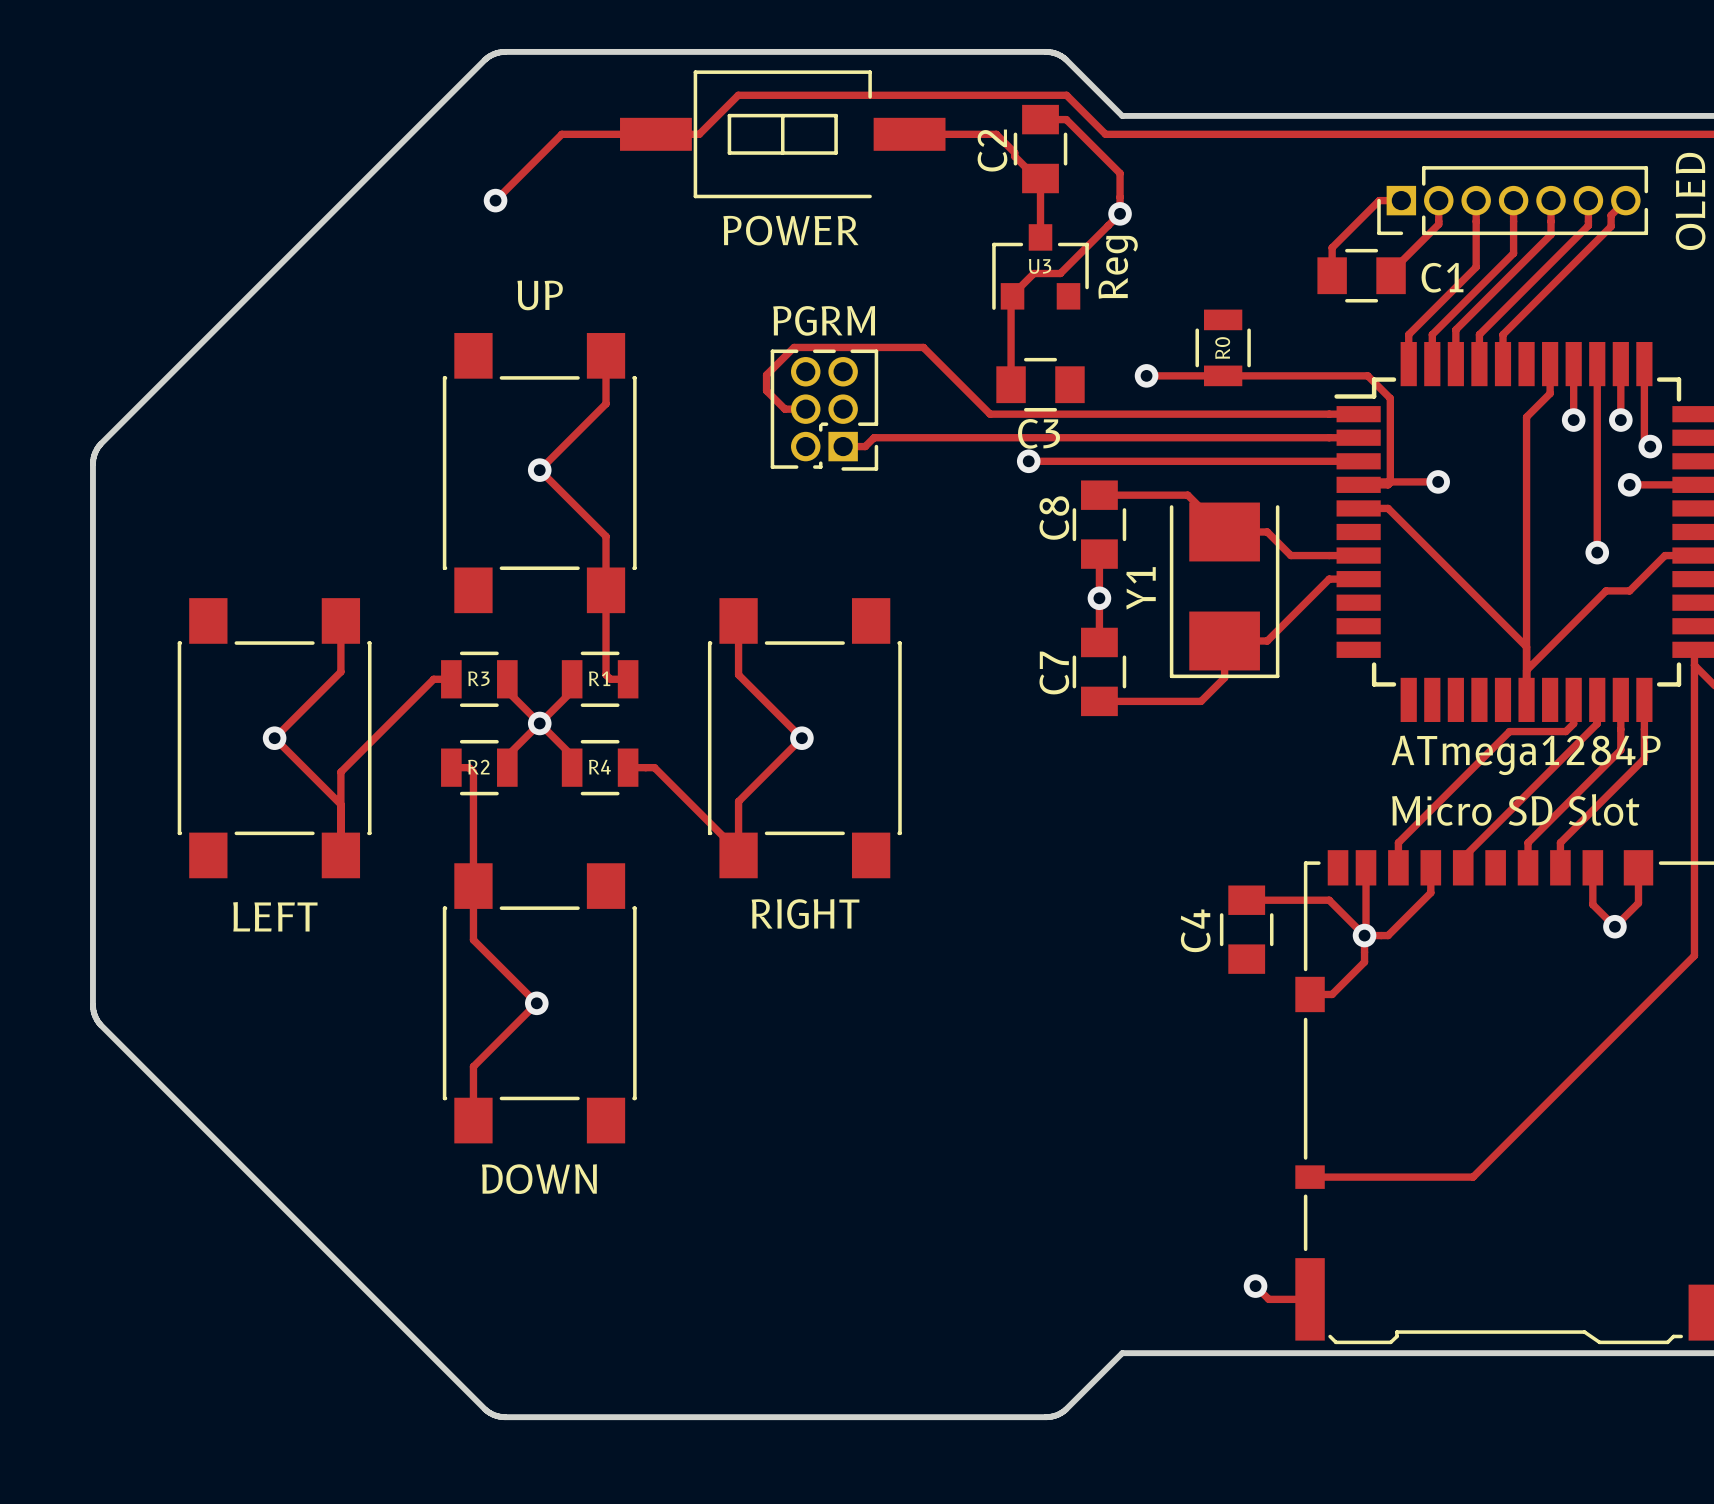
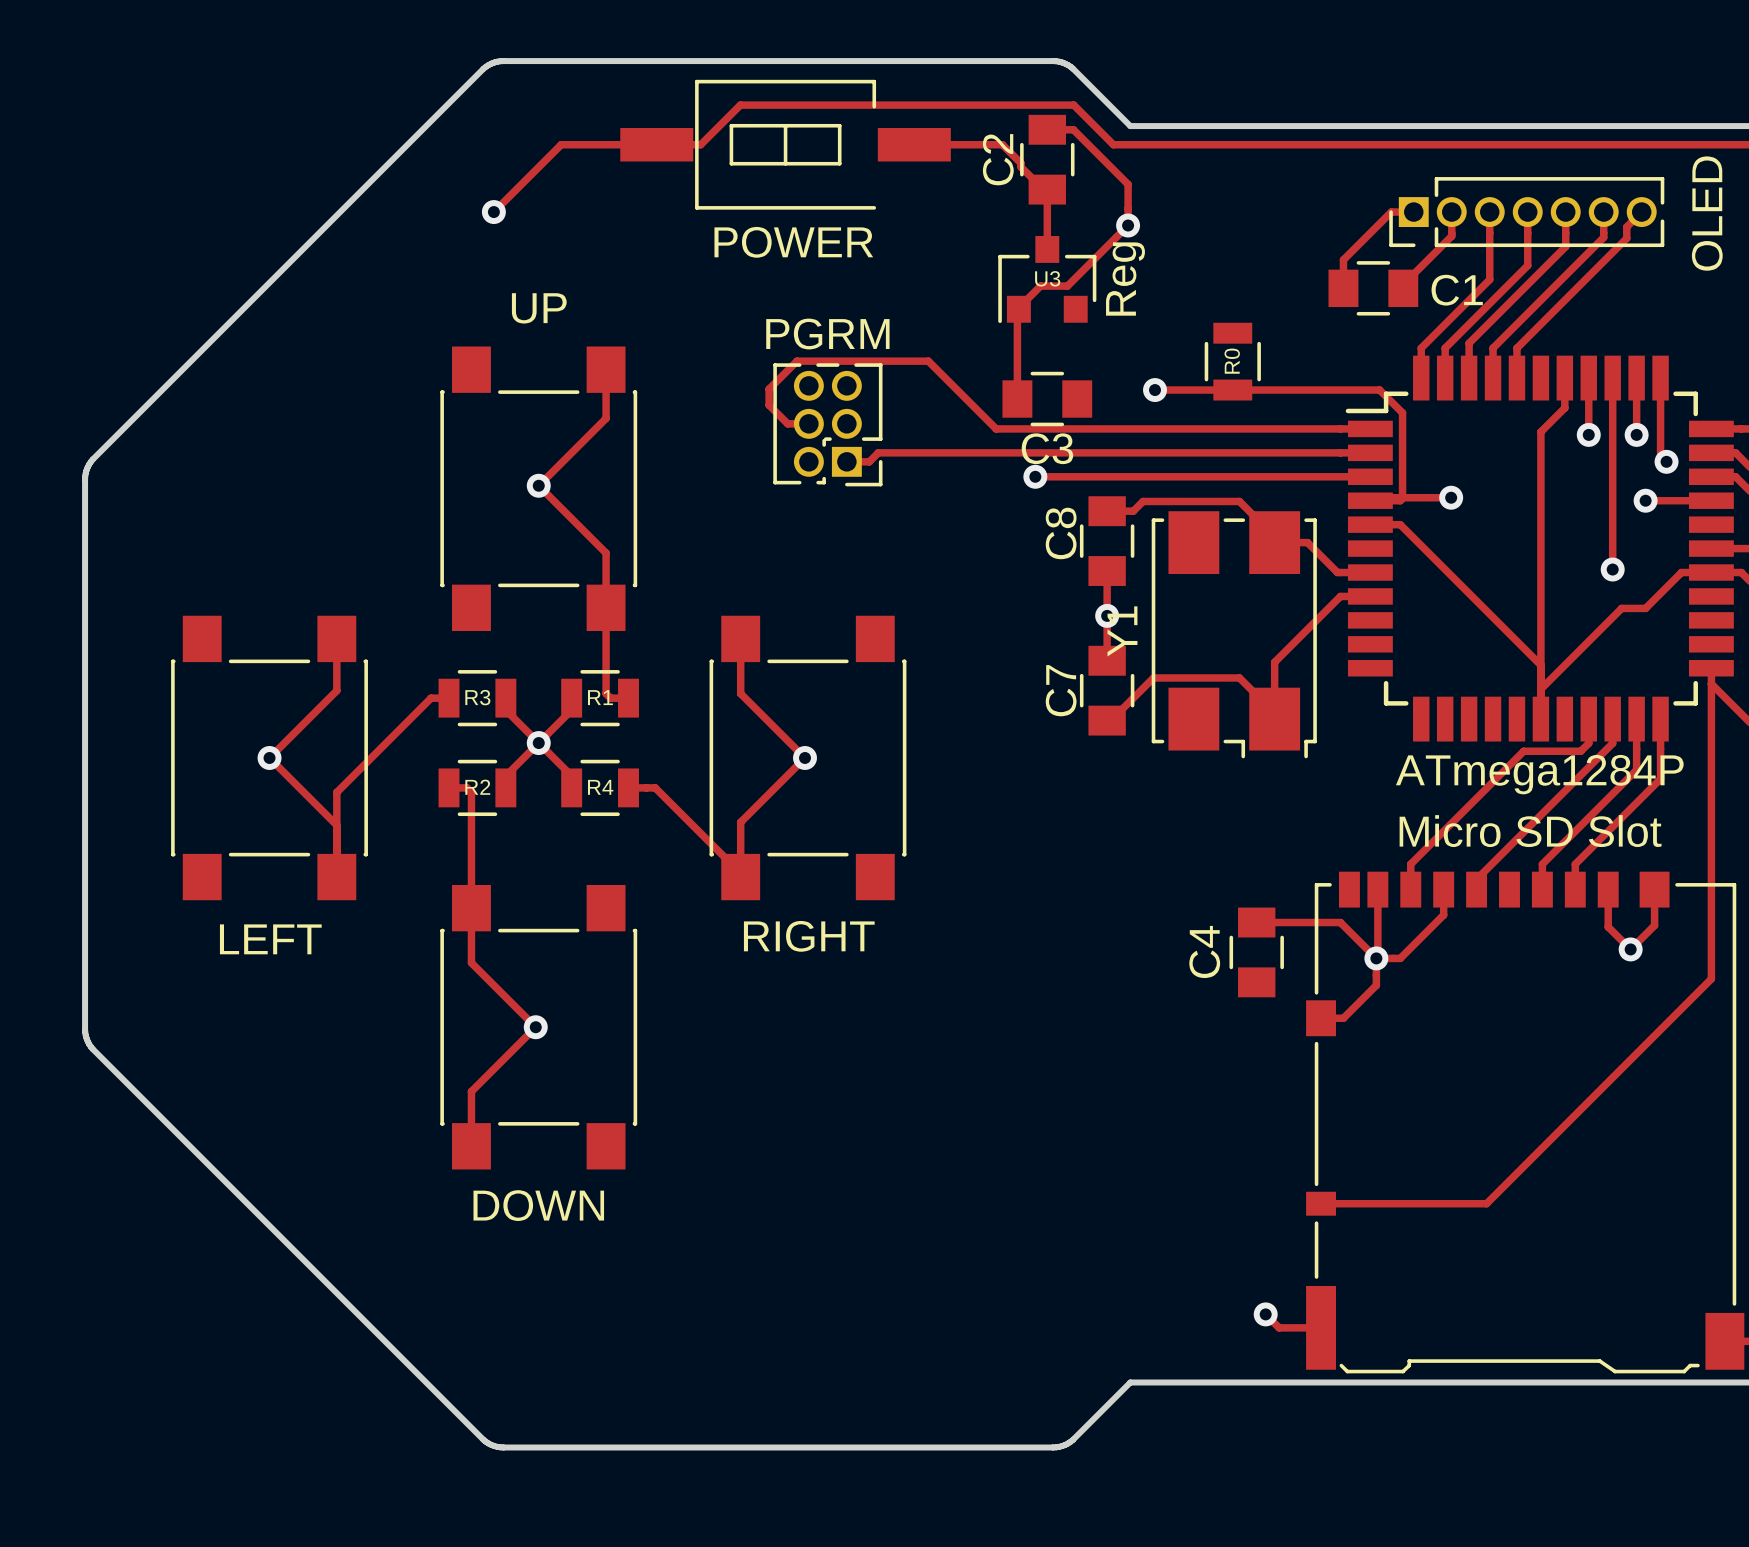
track: (1125, 495) (1187, 495) (1224, 532) (1267, 532) (1290, 555) (1326, 555) -> (1133, 511) (1143, 501) (1239, 501) (1274, 536) (1274, 542) (1307, 542) (1337, 572)
Y1 footprint: [1169, 502, 1280, 679] -> [1151, 511, 1317, 759]
track: (1267, 640) (1224, 640) (1224, 677) (1201, 701) (1103, 701) -> (1274, 713) (1239, 677) (1153, 677) (1110, 720)
track: none -> (1277, 659) (1274, 662) (1274, 719)

